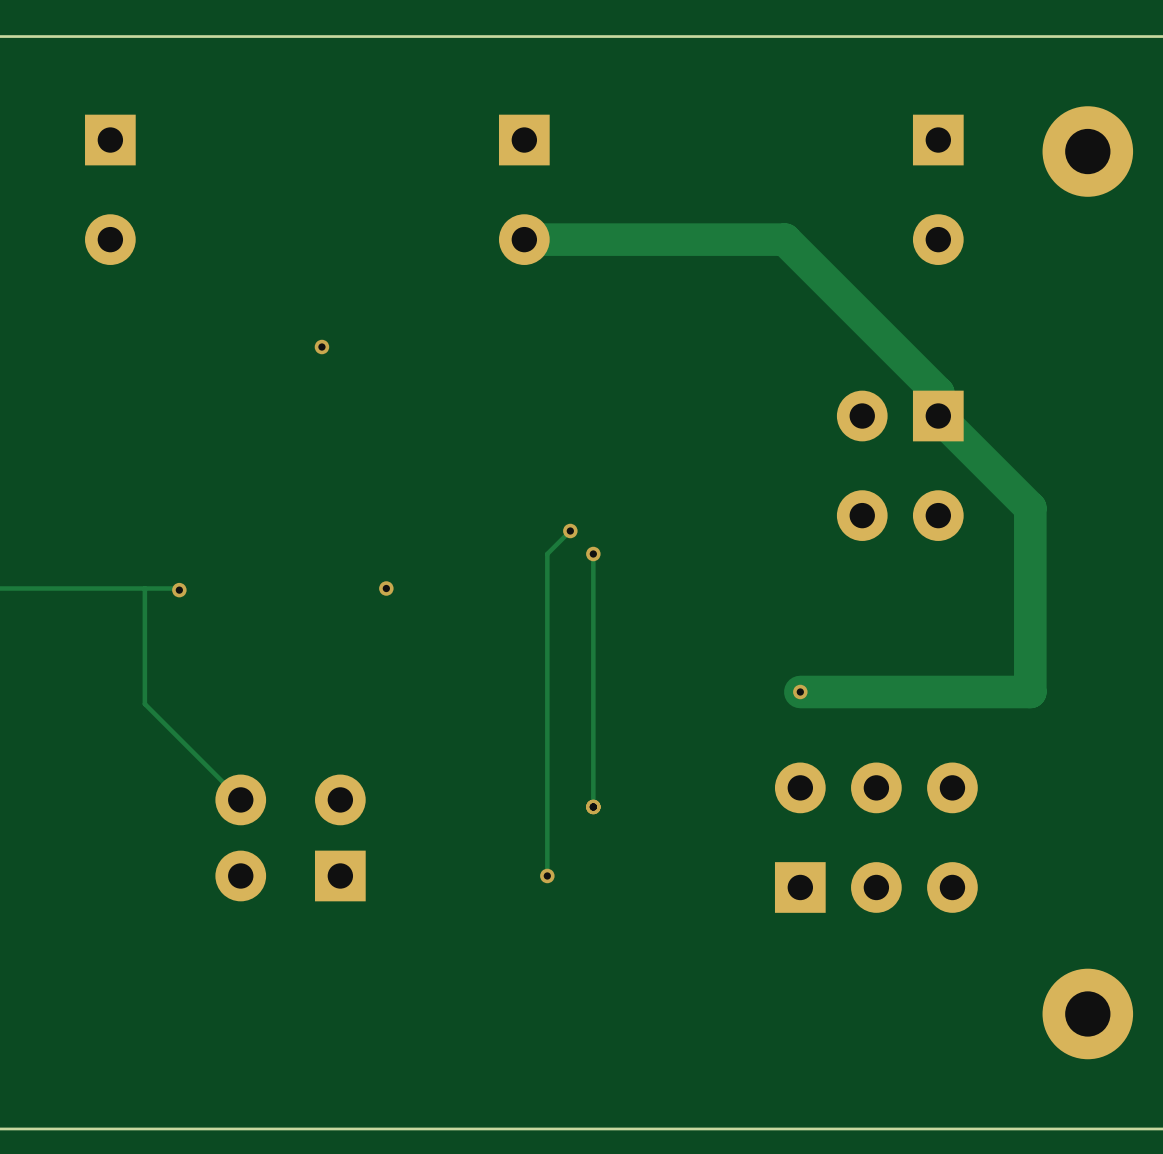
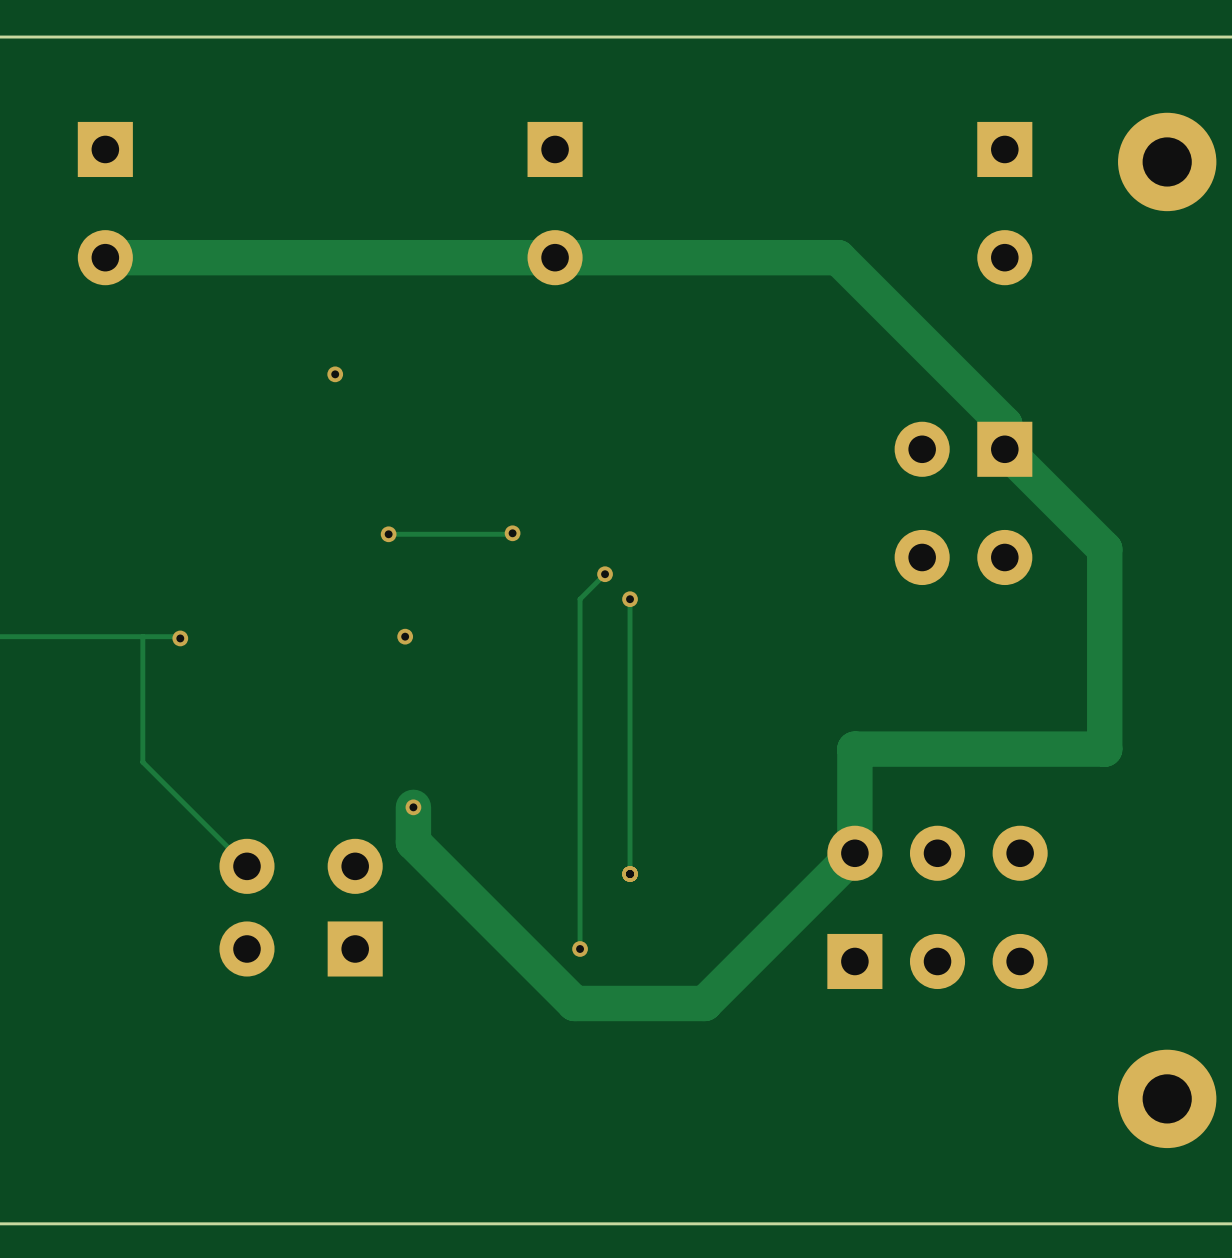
track: none -> (555, 257) (105, 257)
track: none -> (512, 533) (388, 534)
via: none -> (512, 533)
via: none -> (388, 534)
track: none -> (854, 749) (854, 853) (704, 1003) (574, 1003) (413, 842) (413, 807)
via: (800, 691) -> none
via: none -> (413, 807)

